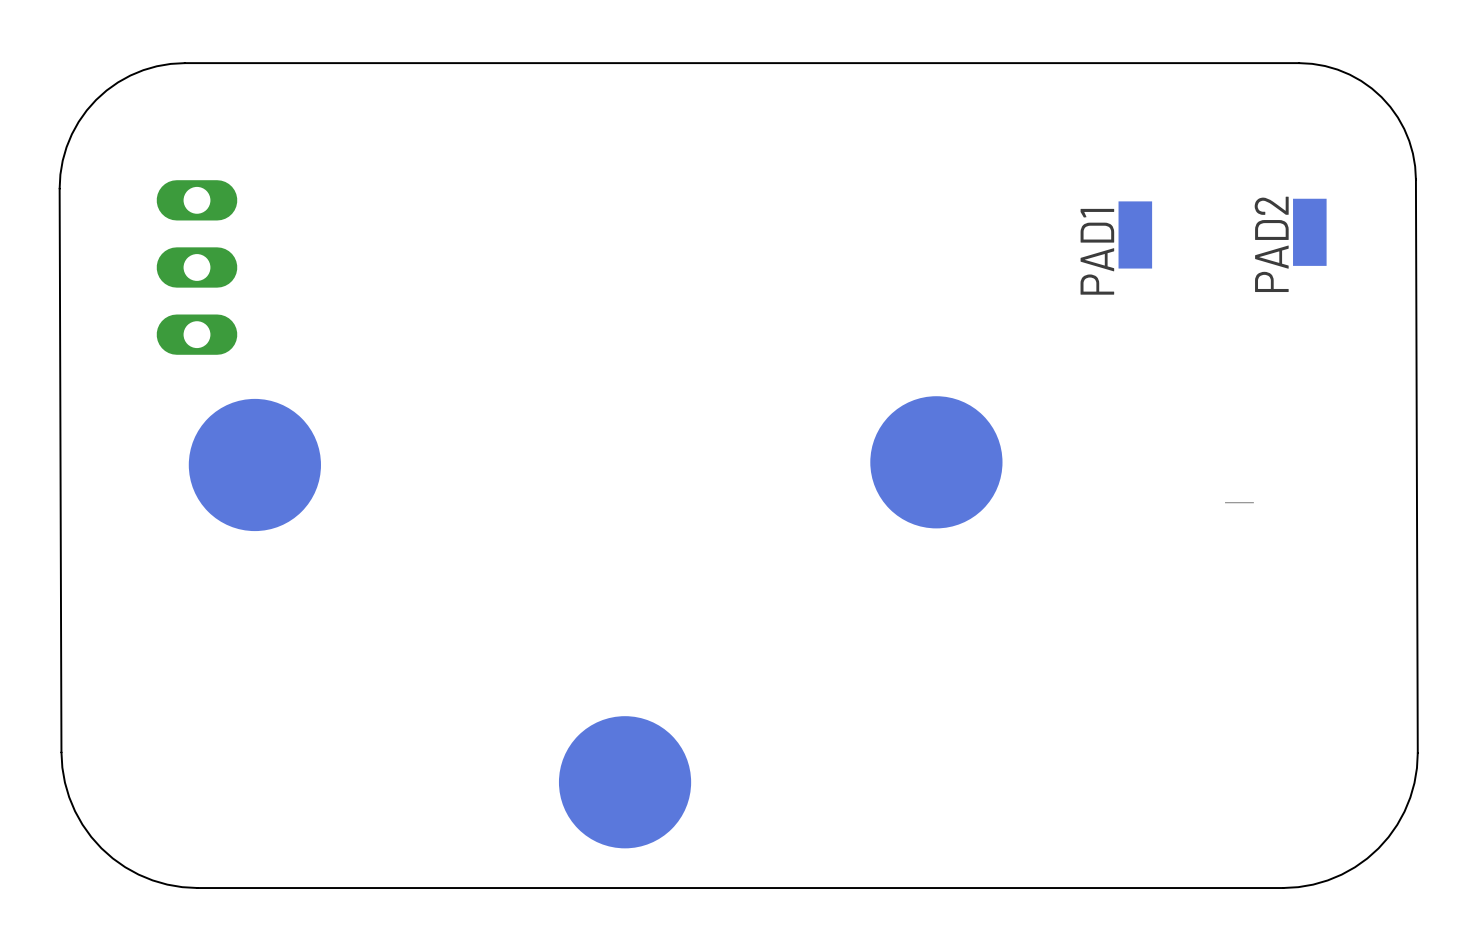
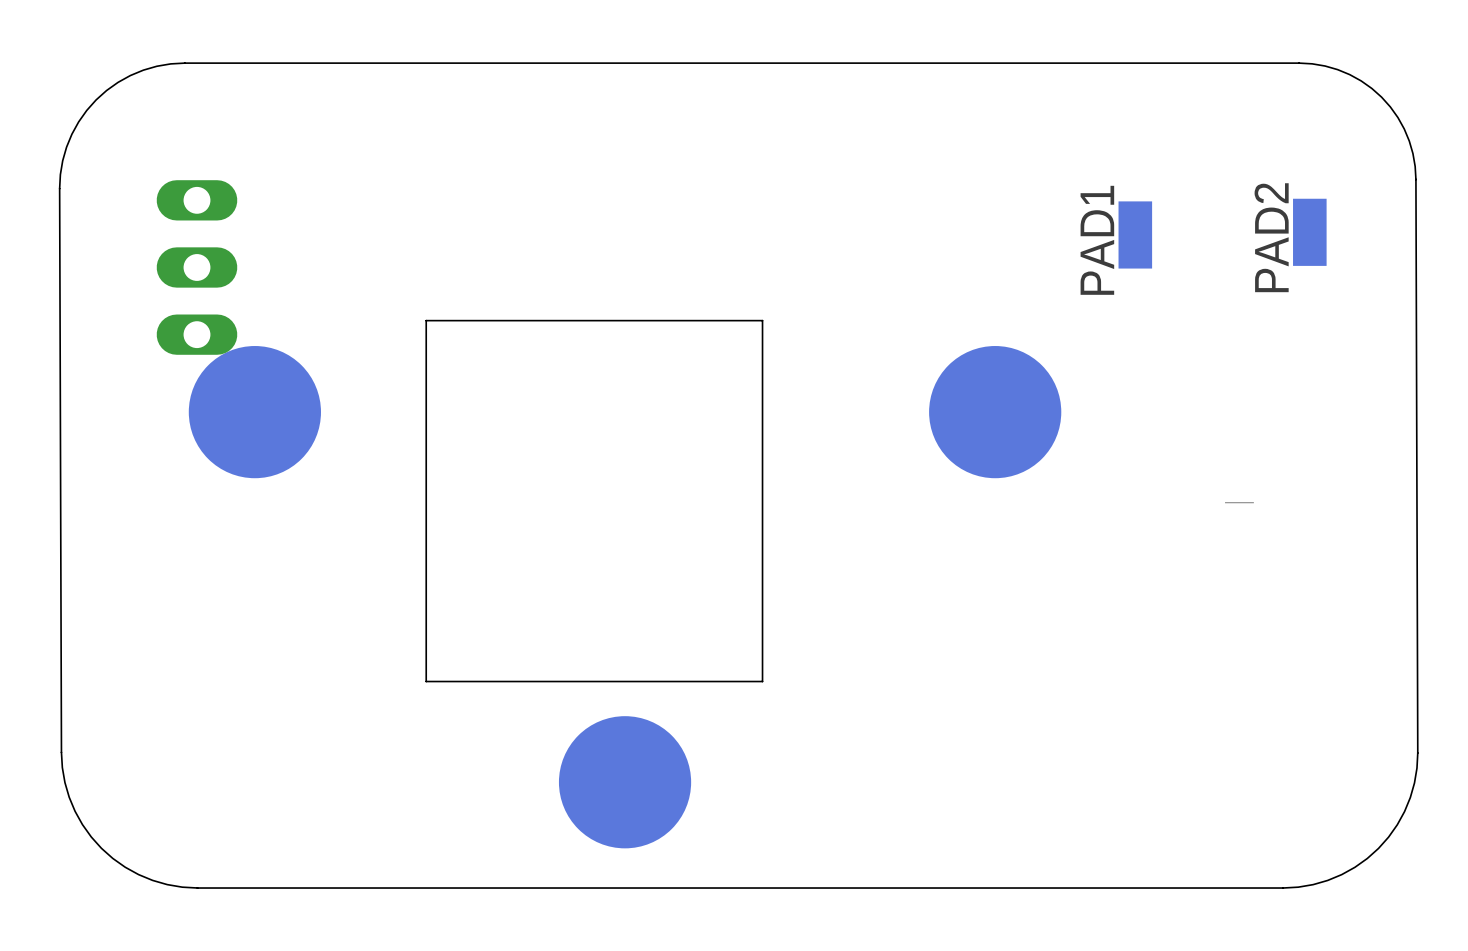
board edge: none -> (762, 320) (426, 320) (426, 681) (762, 681) (762, 320)
part position: (936, 462) -> (995, 412)
part position: (254, 464) -> (254, 412)

